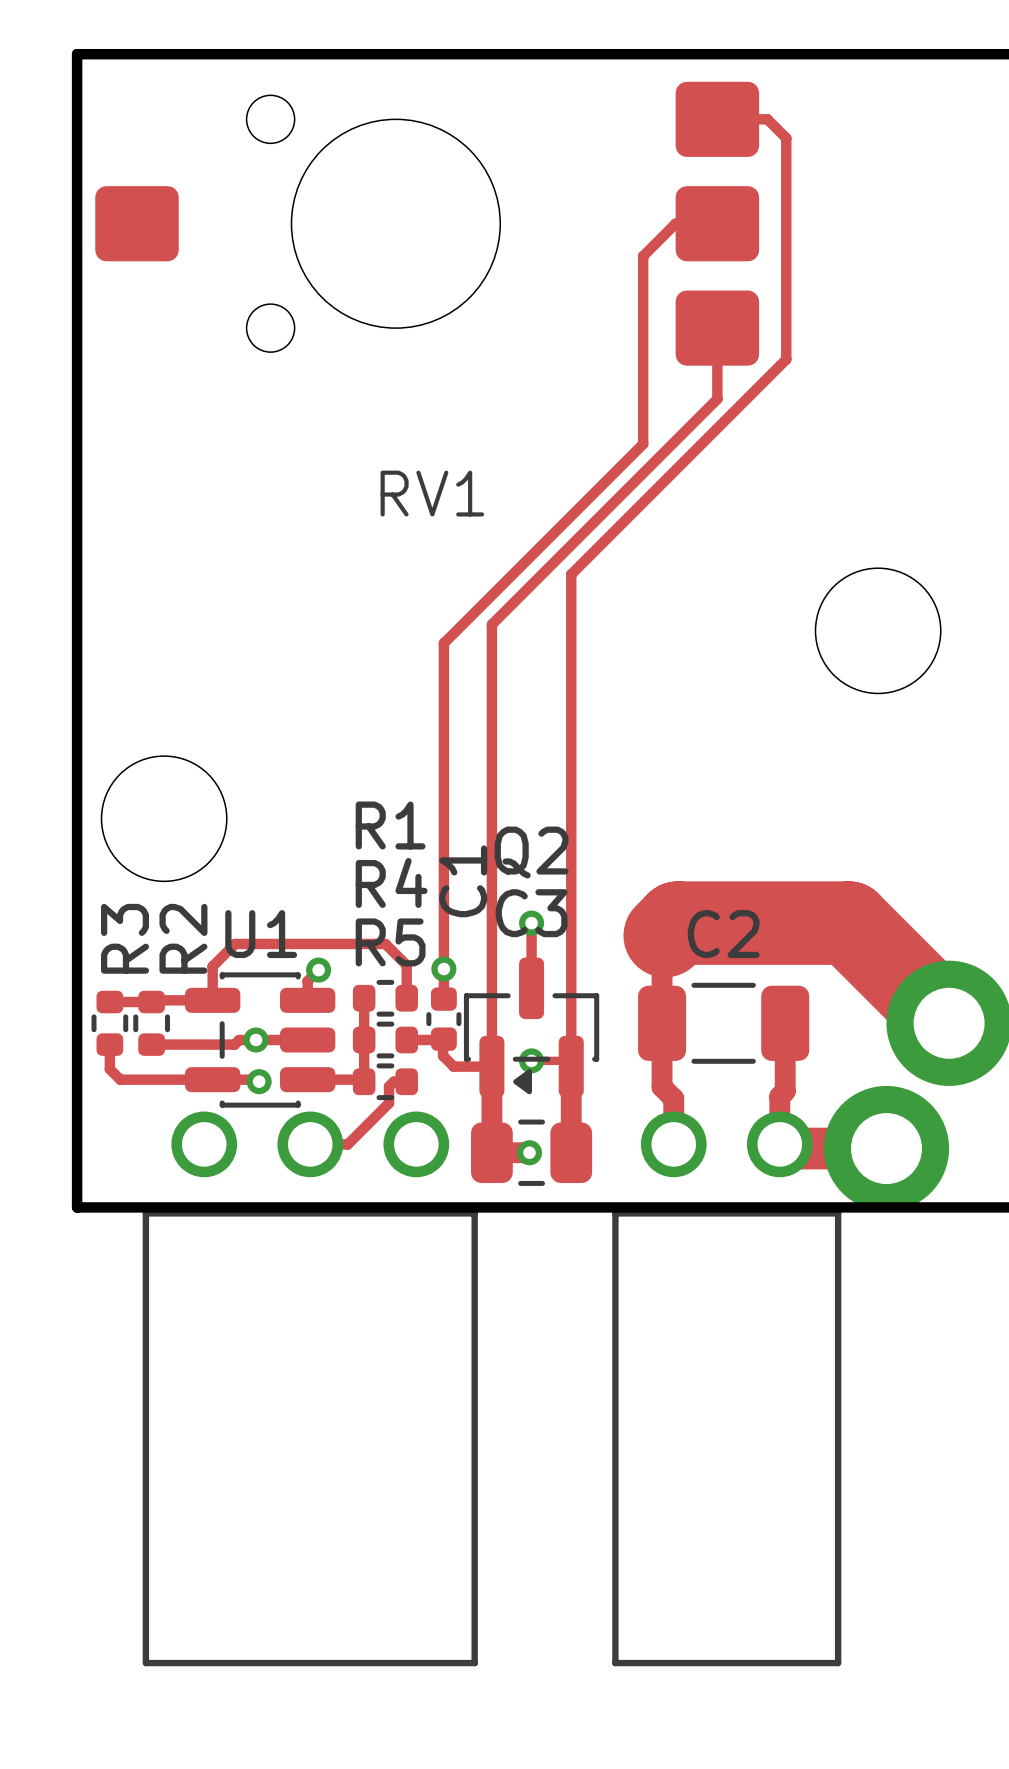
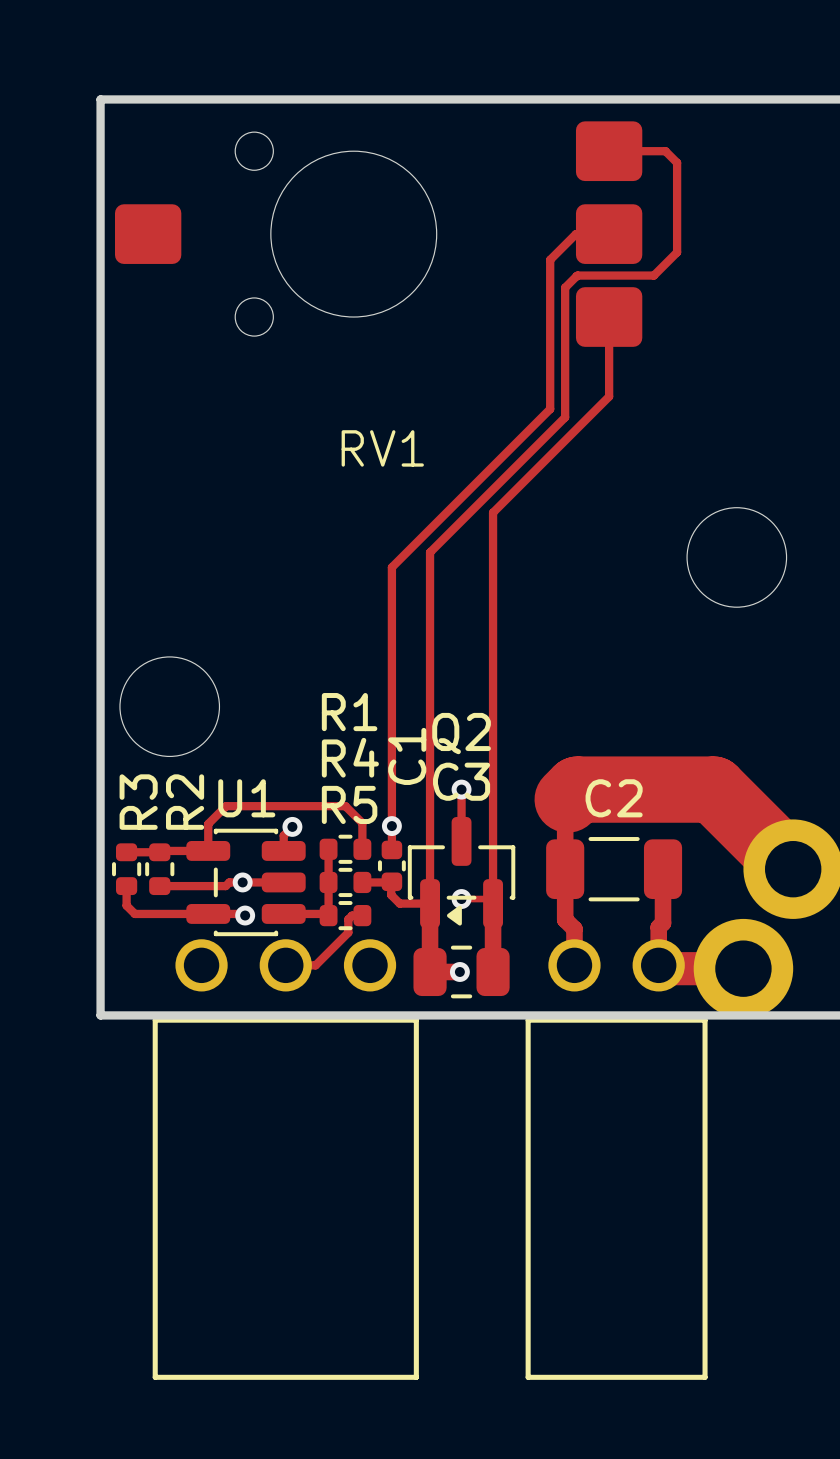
track: (767, 119) (786, 138) (786, 359) (717, 428) -> (648, 151) (665, 151) (677, 162) (677, 252) (653, 275) (577, 275) (565, 287) (565, 417)
track: (717, 399) (662, 454) -> (609, 373) (609, 396)

